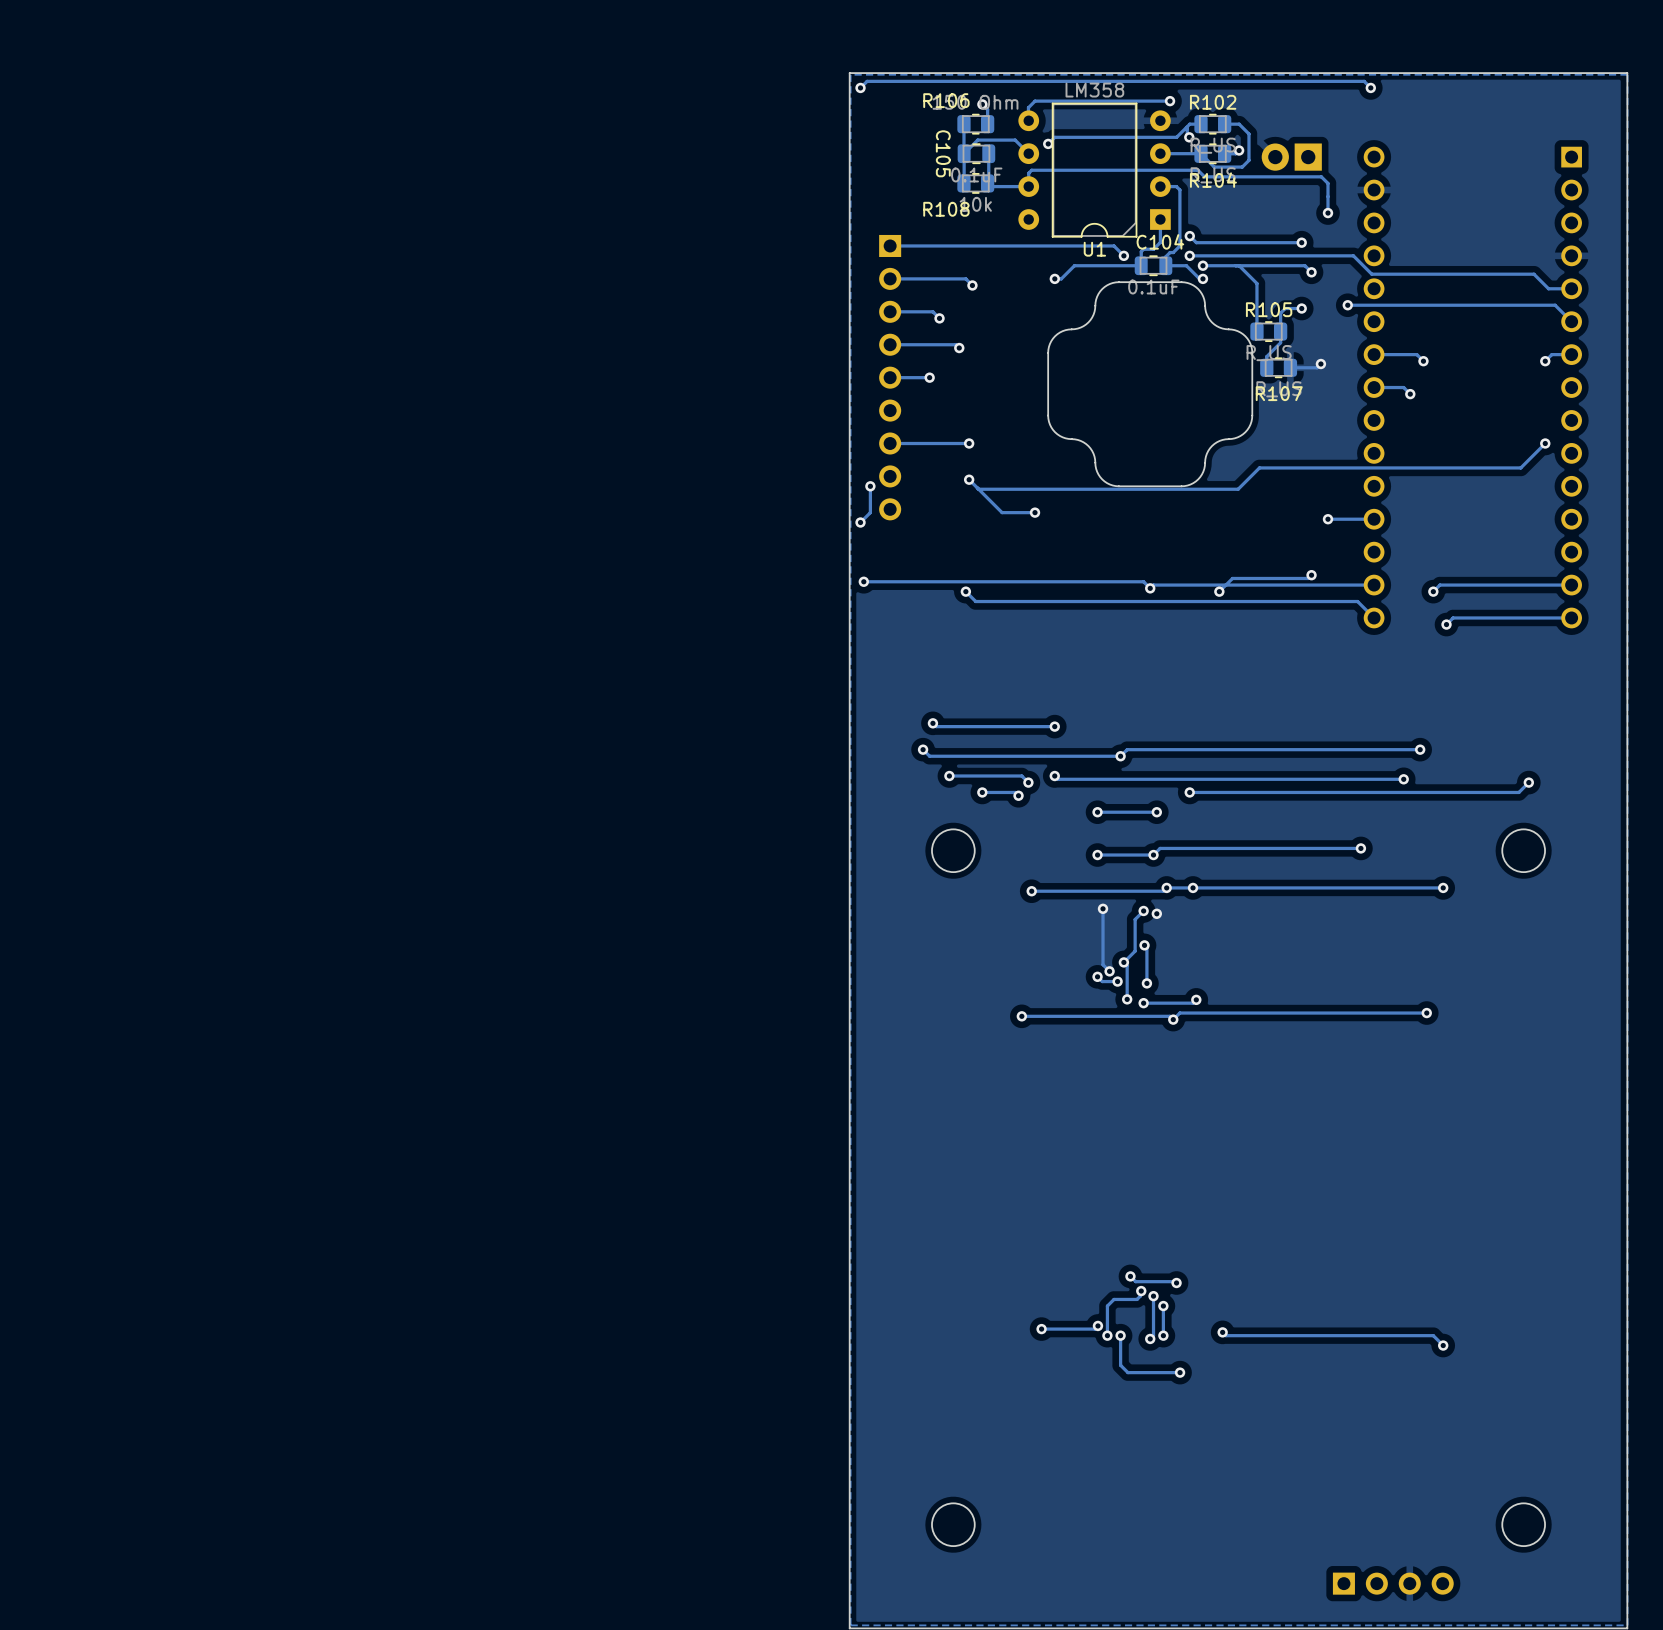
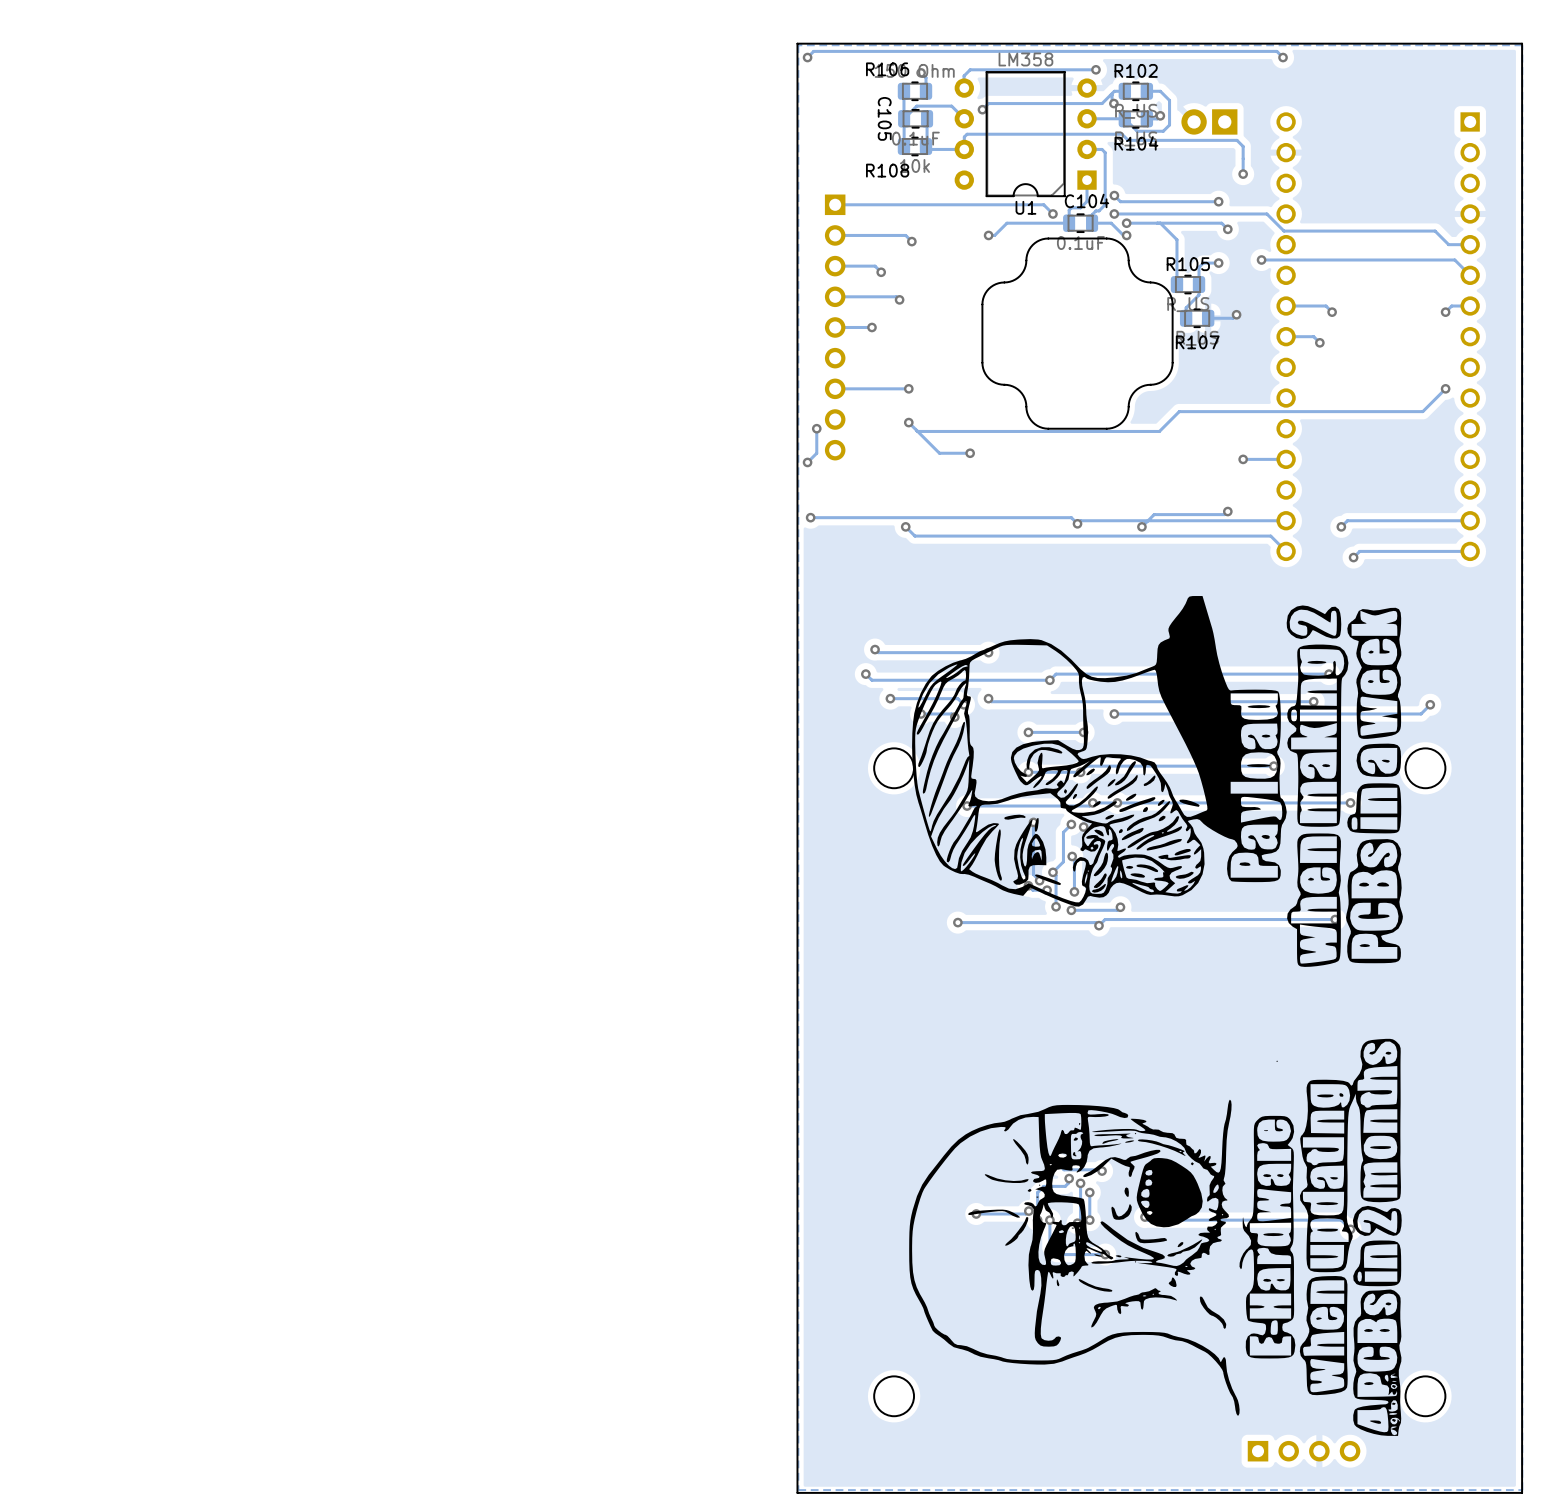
drawing: none -> [909, 596, 1403, 1436]

